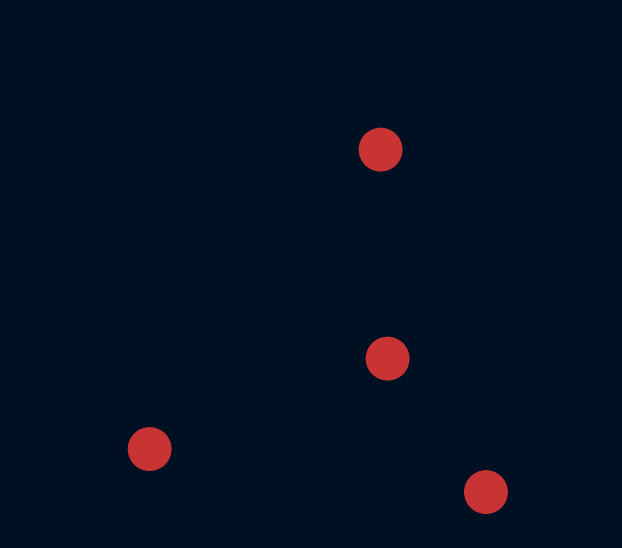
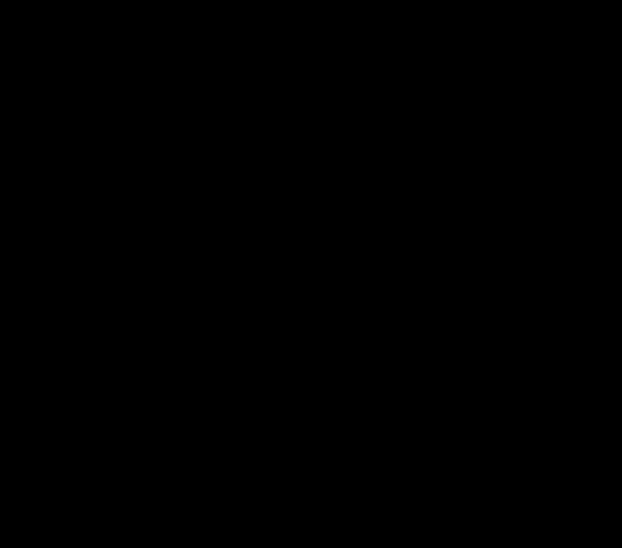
part: (380, 149) -> none
part: (387, 358) -> none
part: (149, 449) -> none
part: (485, 492) -> none

